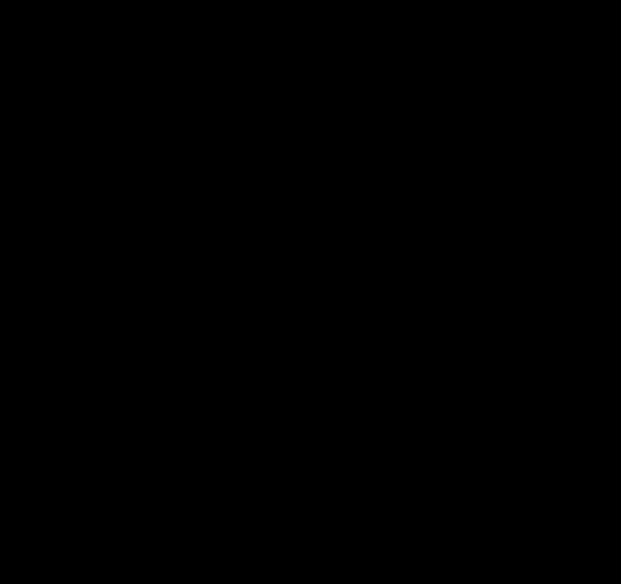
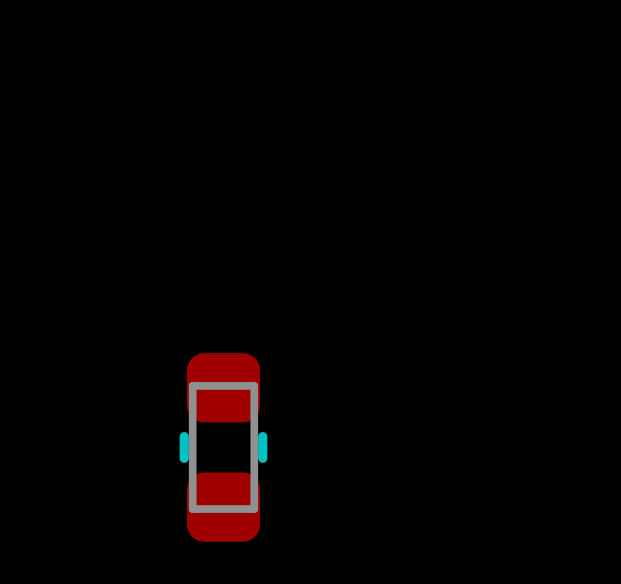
part: none -> (223, 447)

